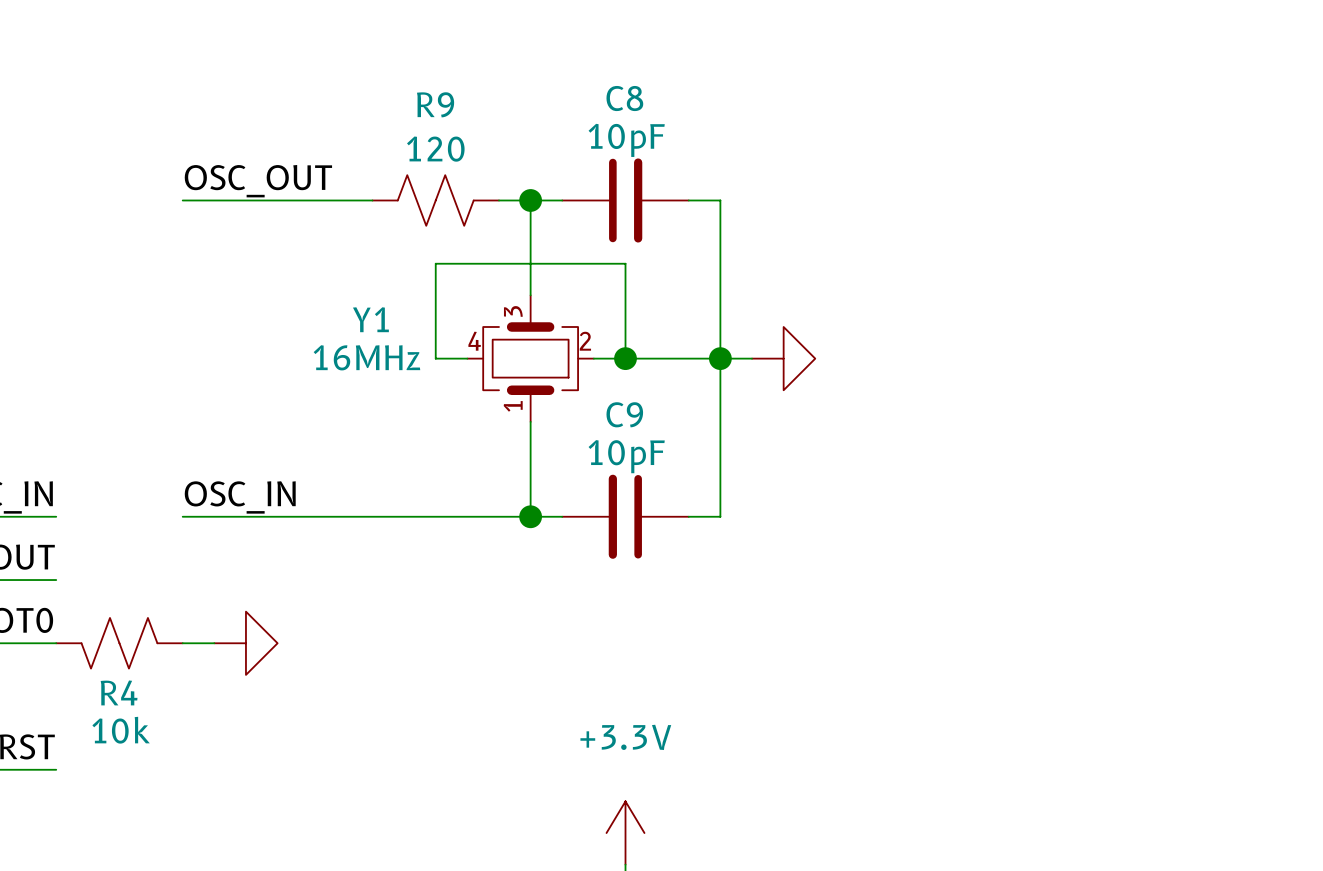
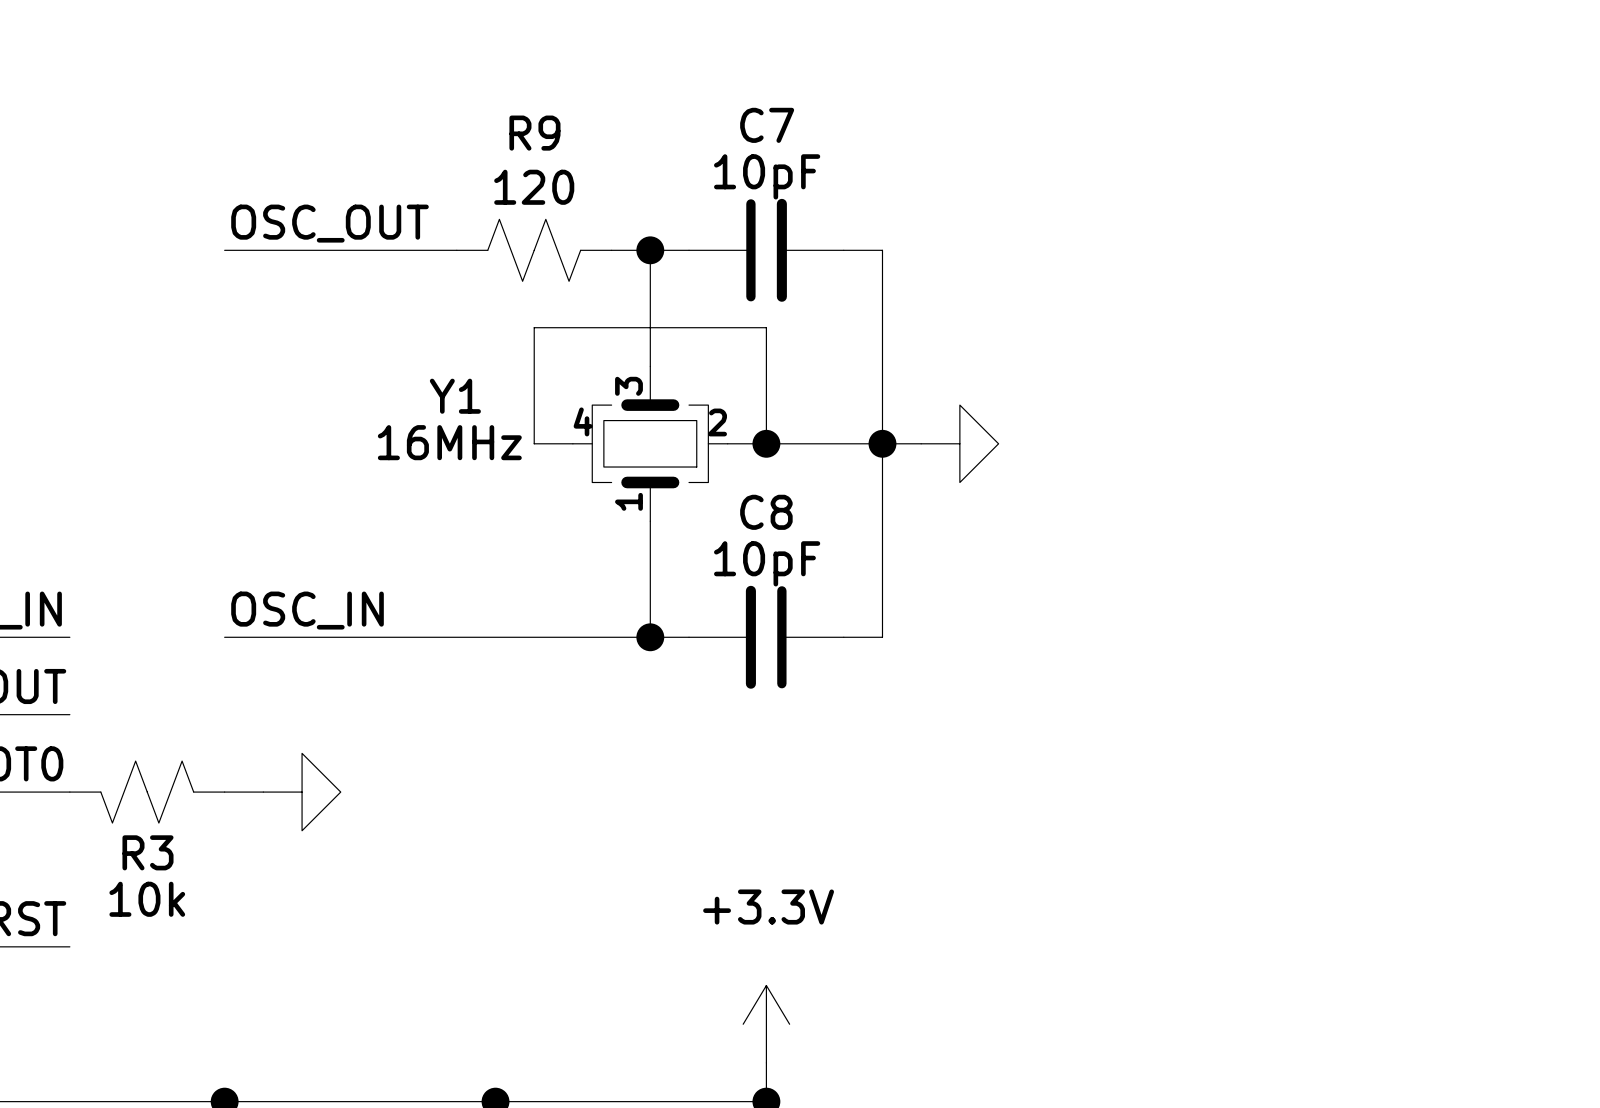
C8 name: C8 (624, 98) -> C7 (767, 125)
C9 name: C9 (624, 414) -> C8 (766, 512)
R4 name: R4 (119, 692) -> R3 (147, 852)

